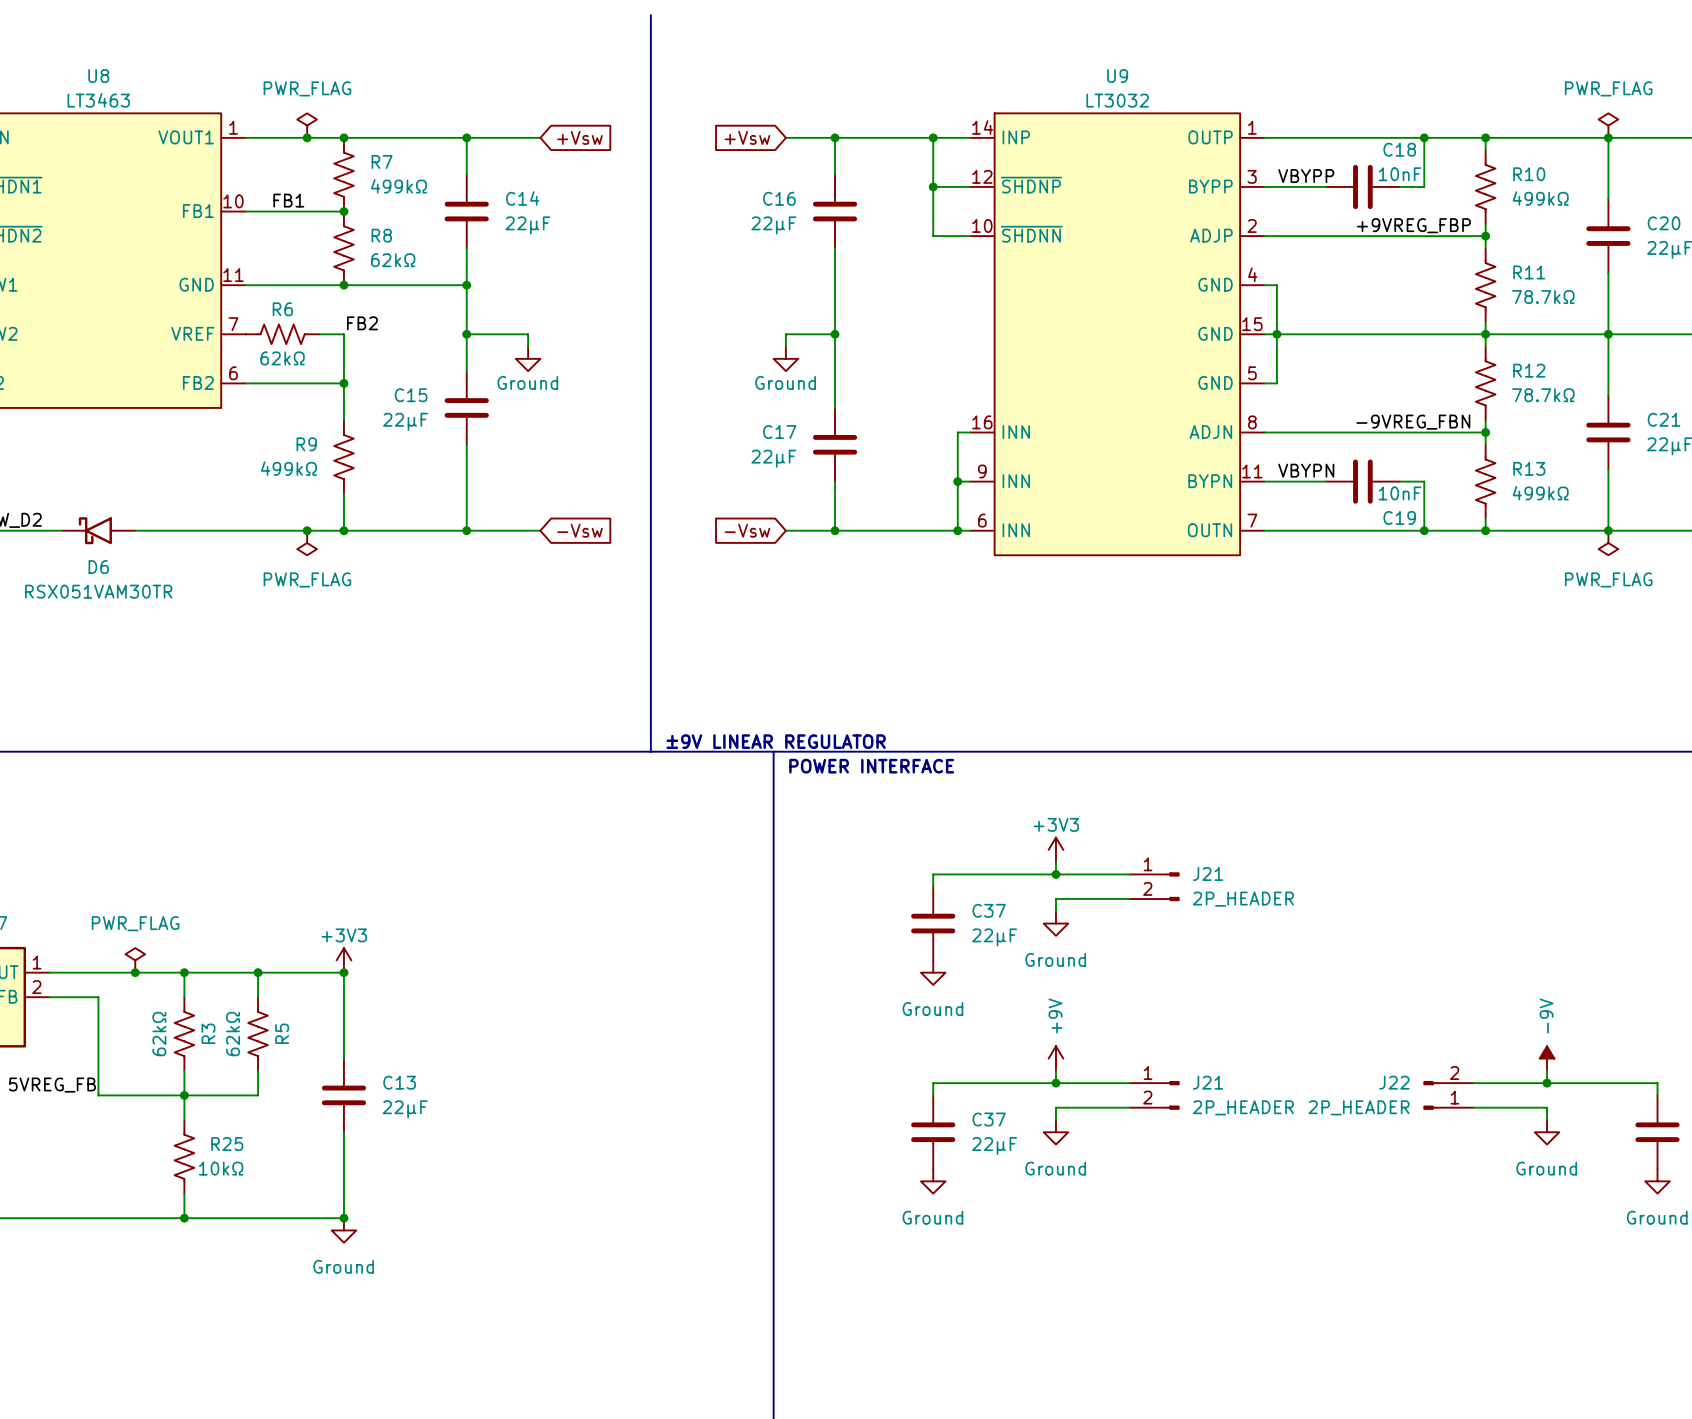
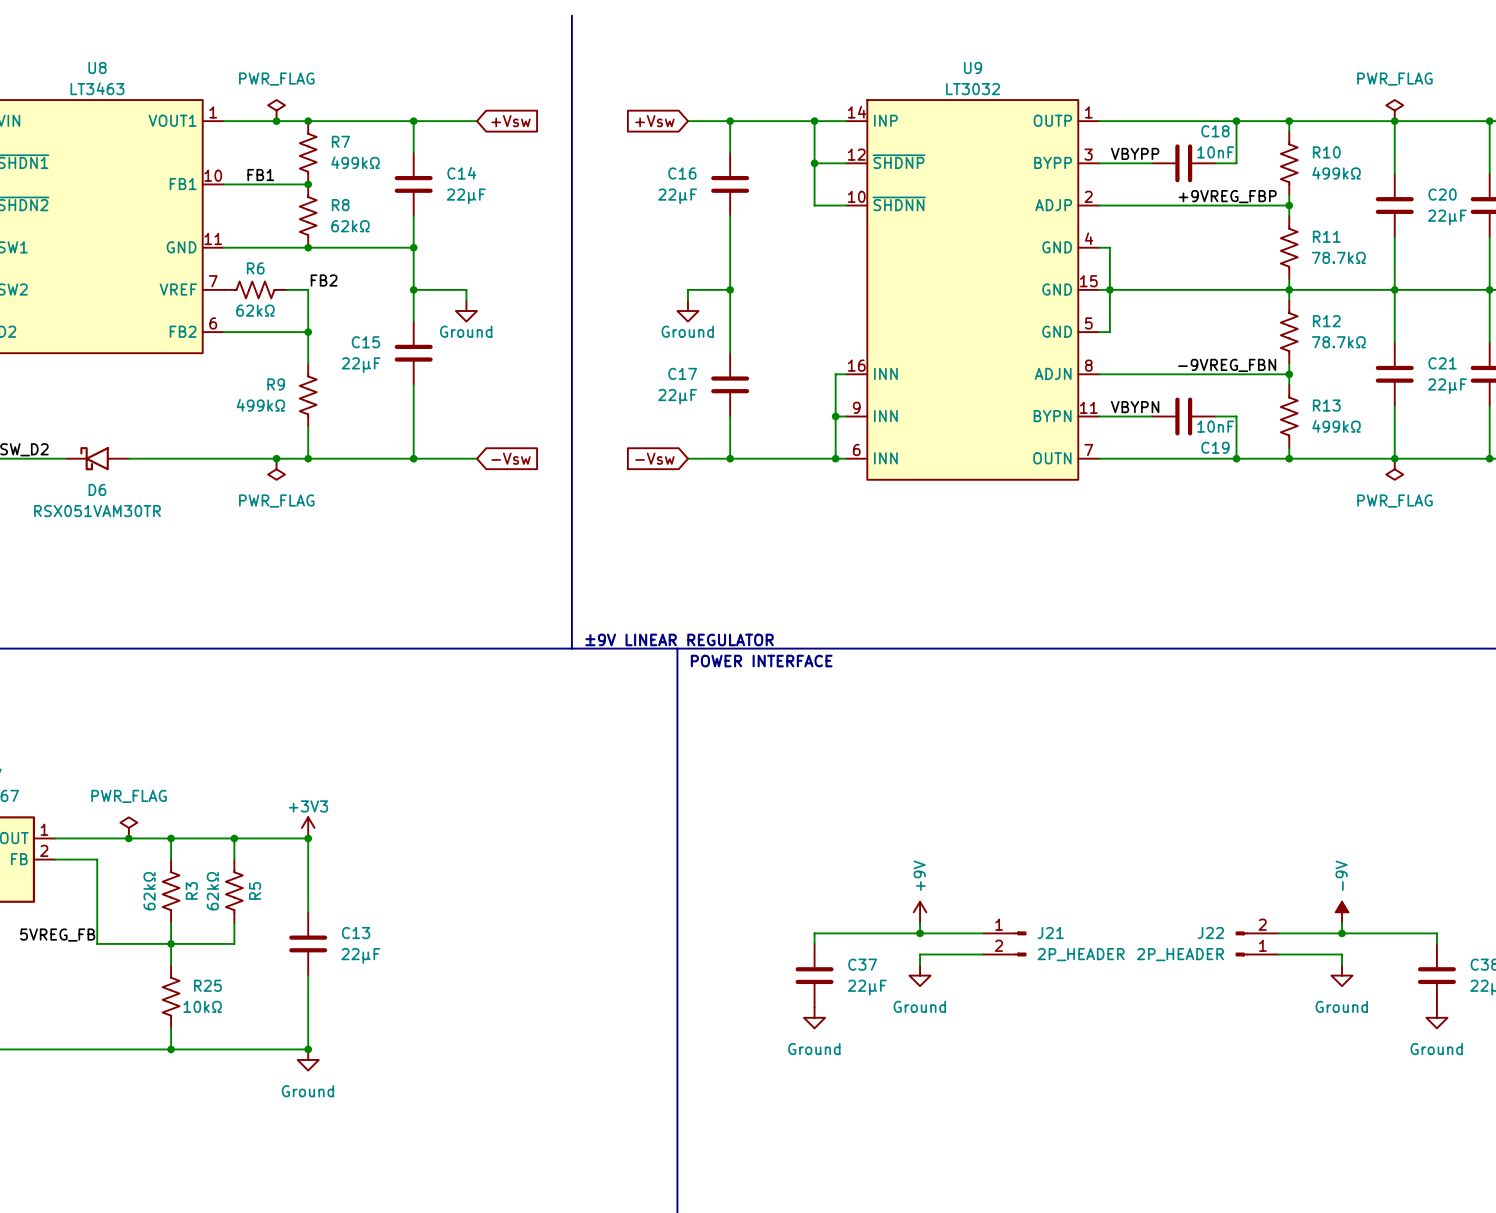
power symbol: +3V3 (1055, 849) -> none
wire: (1055, 862) (1055, 874) -> none
junction: (1055, 874) -> none
wire: (1129, 874) (933, 874) (933, 886) -> none
J21: 2P_HEADER (1154, 886) -> none
wire: (1129, 899) (1055, 899) (1055, 911) -> none
C37: 22μF (933, 923) -> none
power symbol: Ground (1055, 923) -> none
power symbol: Ground (933, 972) -> none

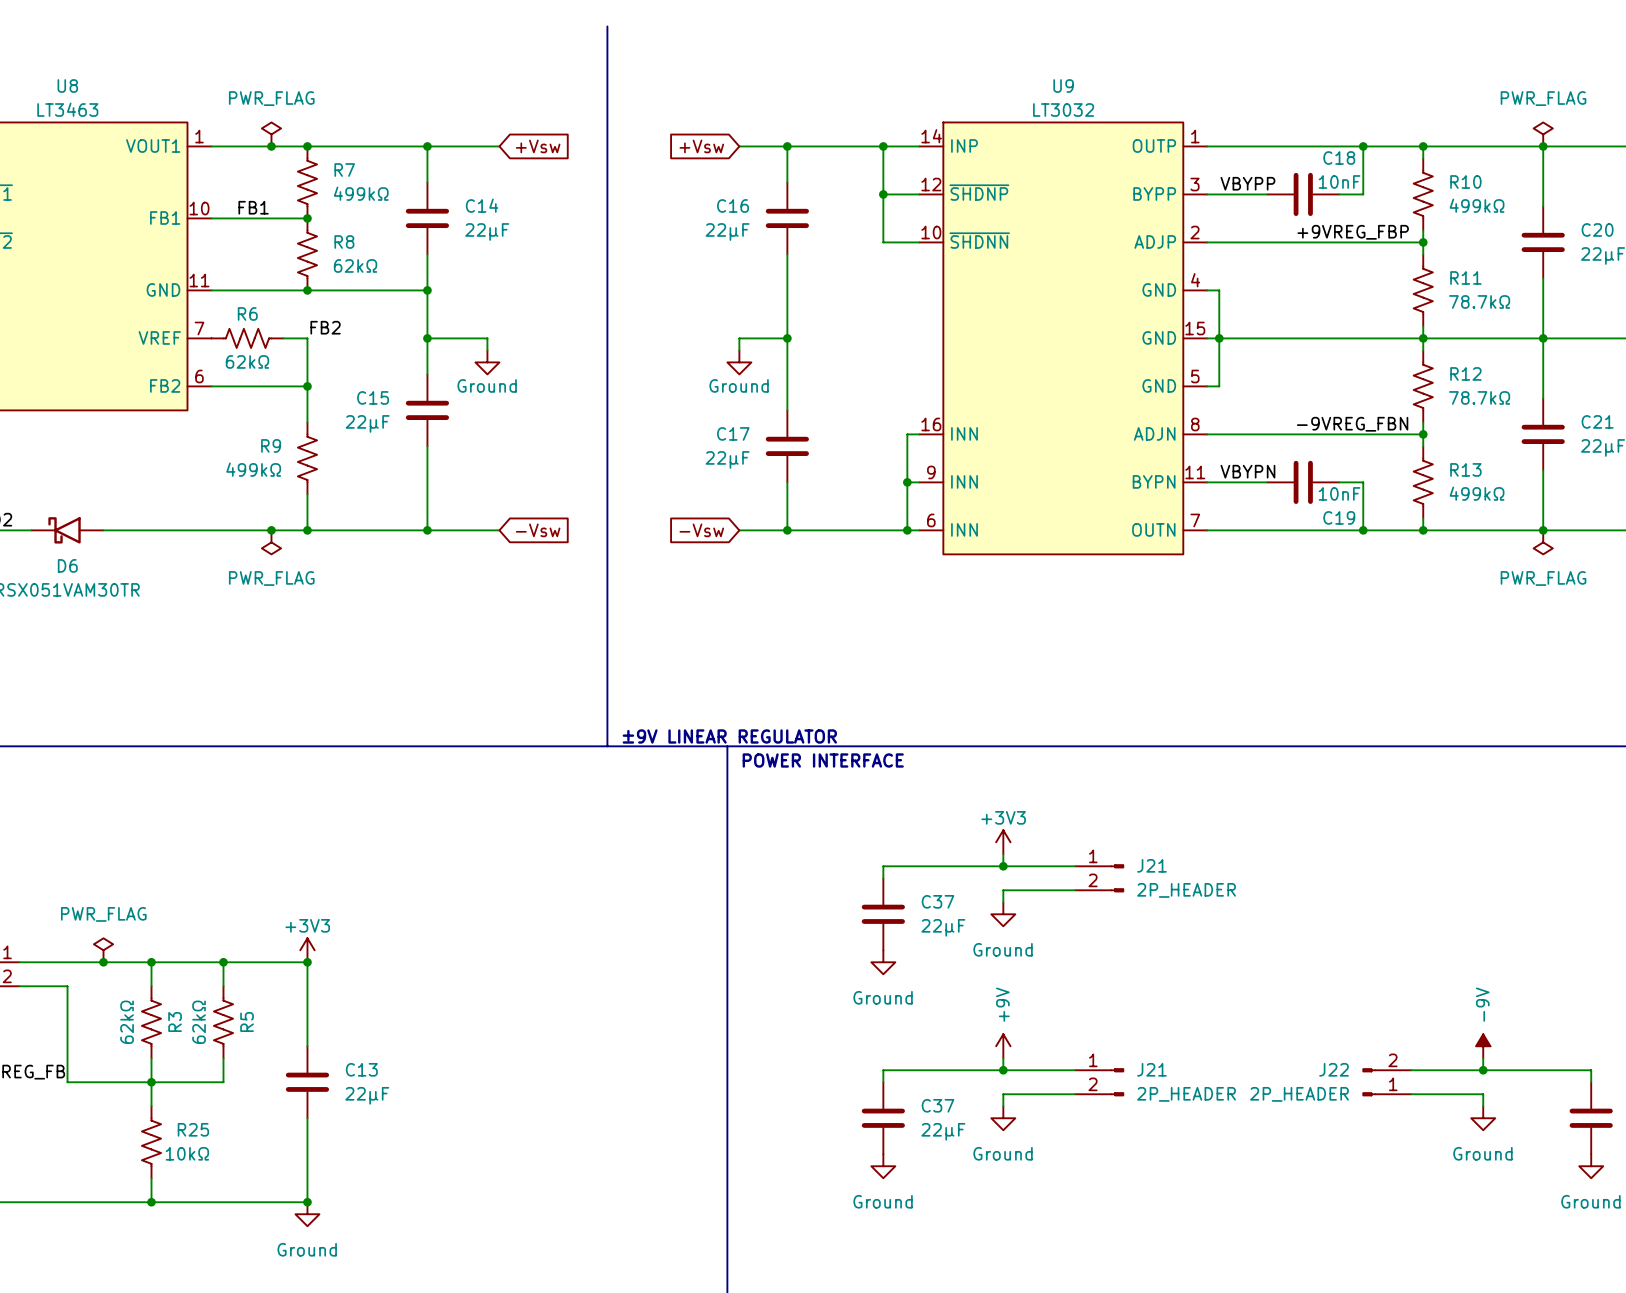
power symbol: none -> +3V3 (1003, 842)
wire: none -> (1003, 854) (1003, 866)
junction: none -> (1003, 866)
wire: none -> (1075, 866) (883, 866) (883, 878)
J21: none -> 2P_HEADER (1099, 878)
wire: none -> (1075, 890) (1003, 890) (1003, 902)
C37: none -> 22μF (883, 914)
power symbol: none -> Ground (1003, 914)
power symbol: none -> Ground (883, 962)

